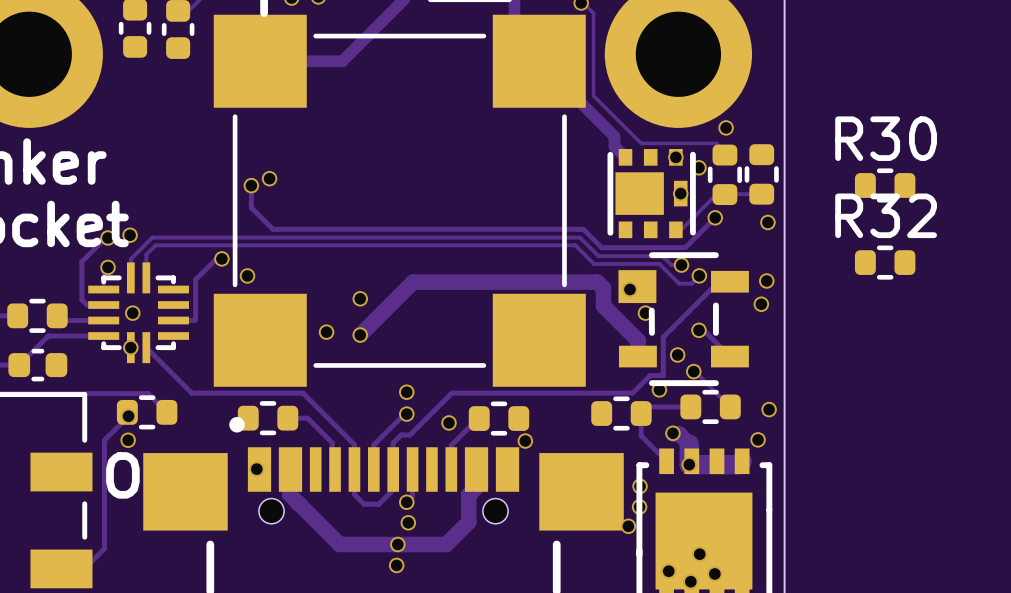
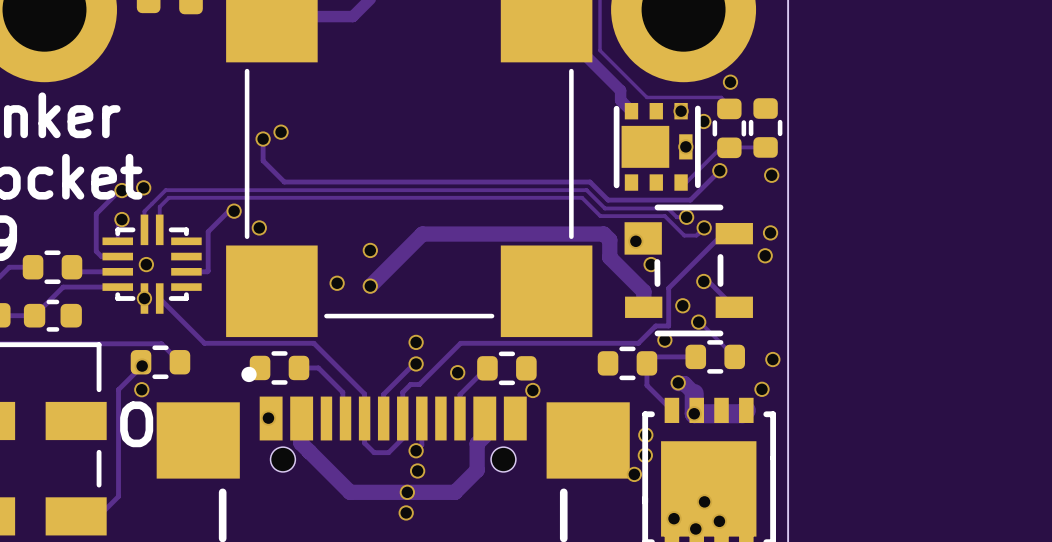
R30: (885, 185) -> none
R32: (885, 262) -> none

